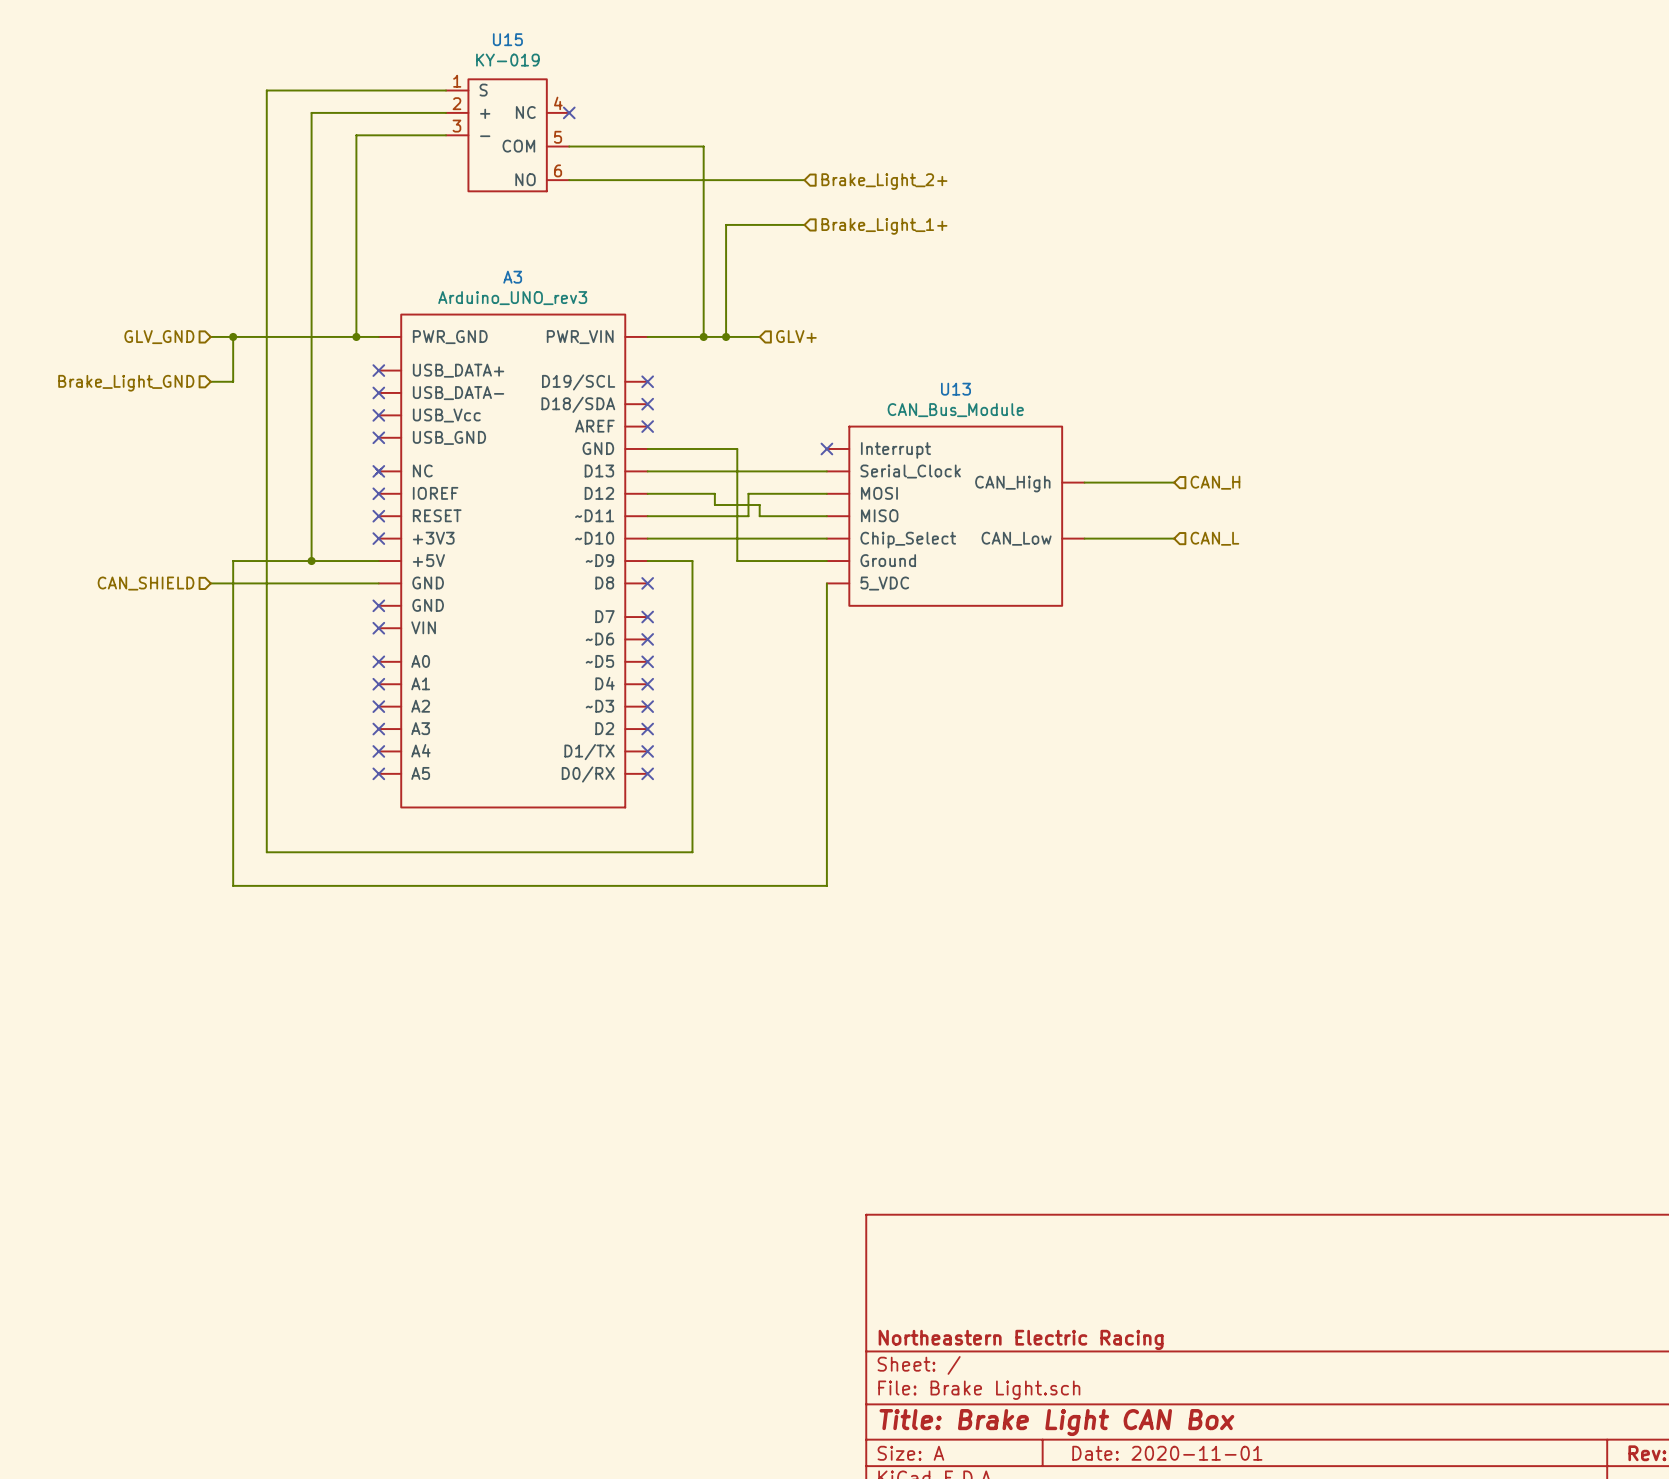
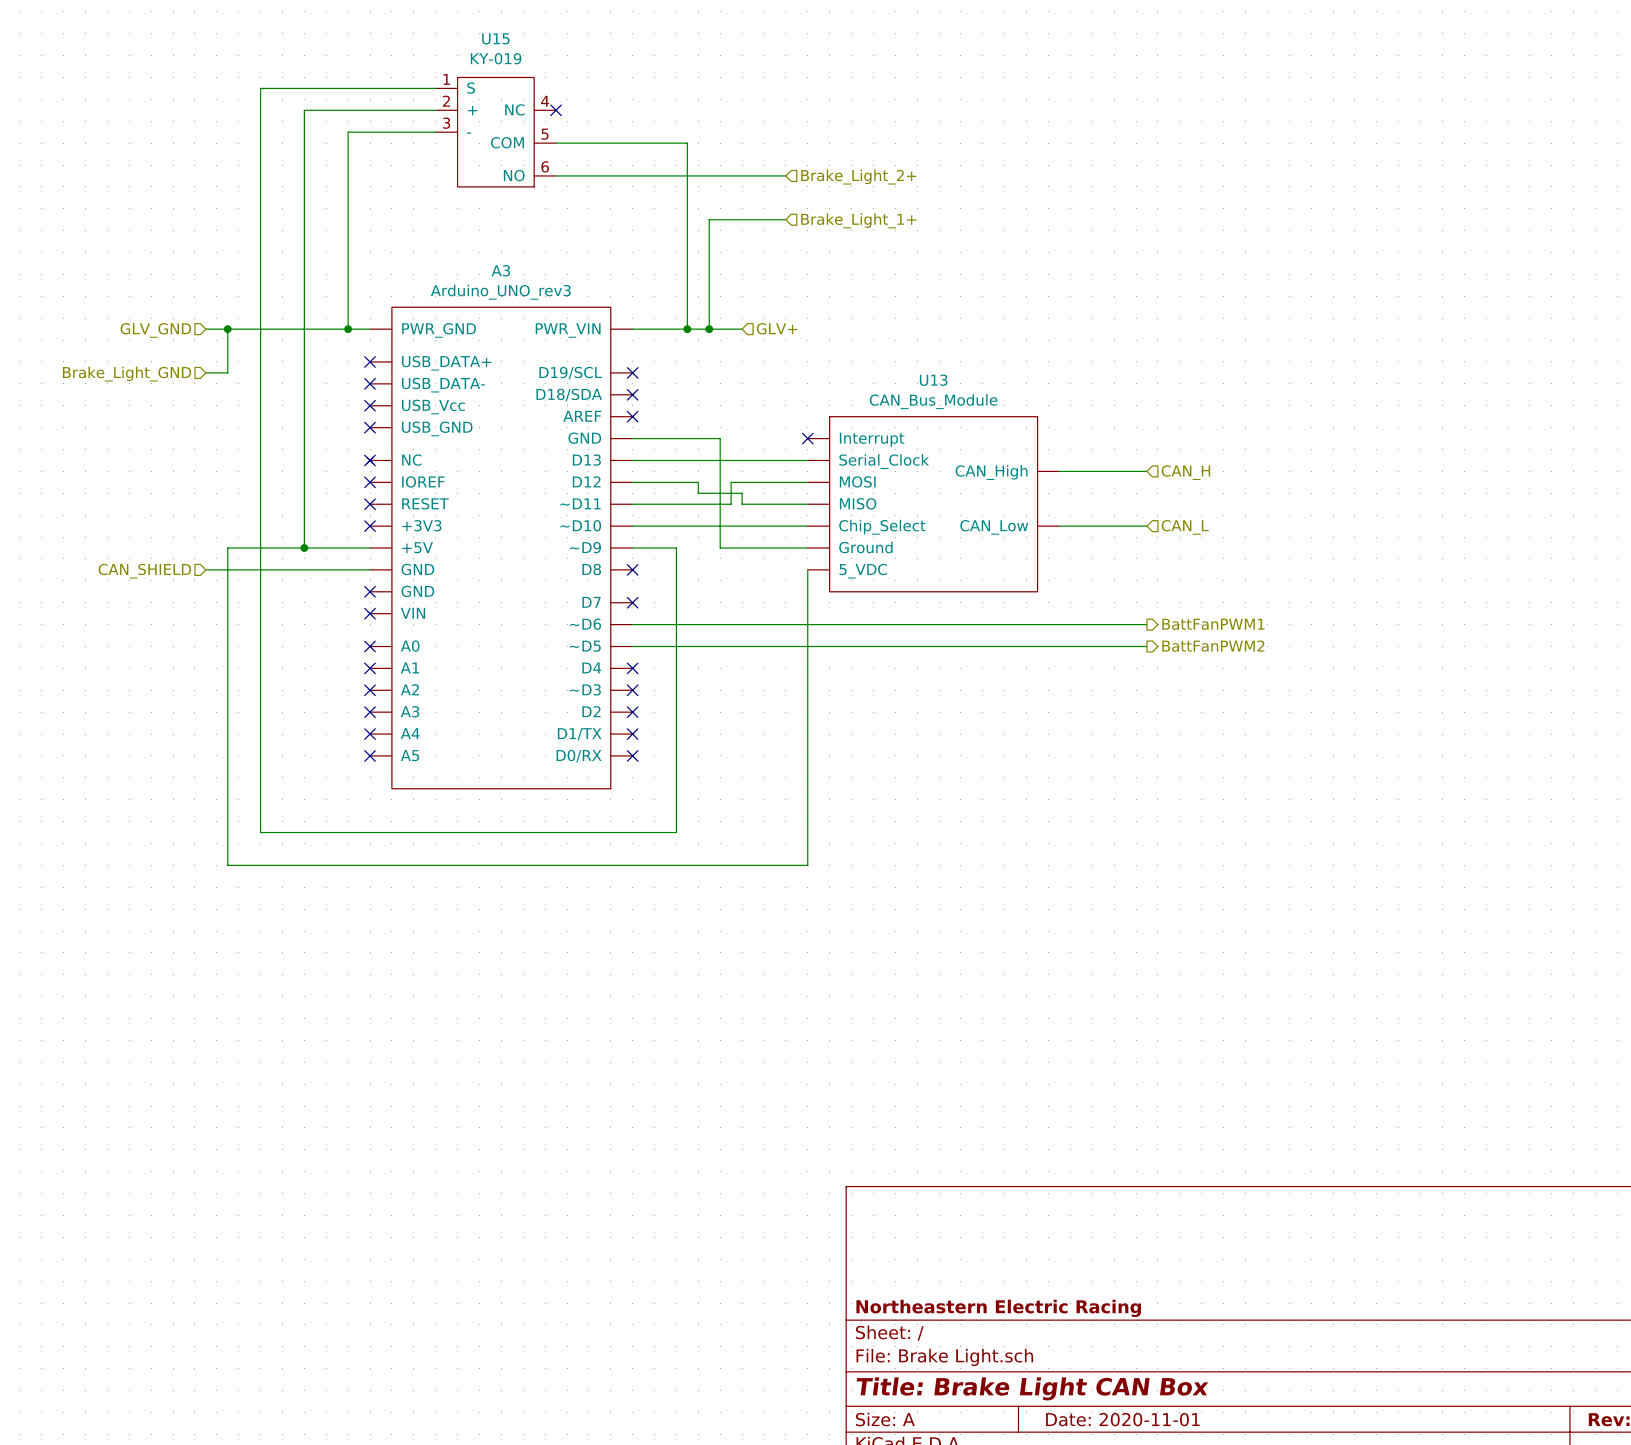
wire: none -> (632, 624) (1146, 624)
no-connect mark: (647, 639) -> none
hierarchical label: none -> BattFanPWM1 (1213, 624)
wire: none -> (632, 646) (1146, 646)
no-connect mark: (647, 661) -> none
hierarchical label: none -> BattFanPWM2 (1213, 646)

